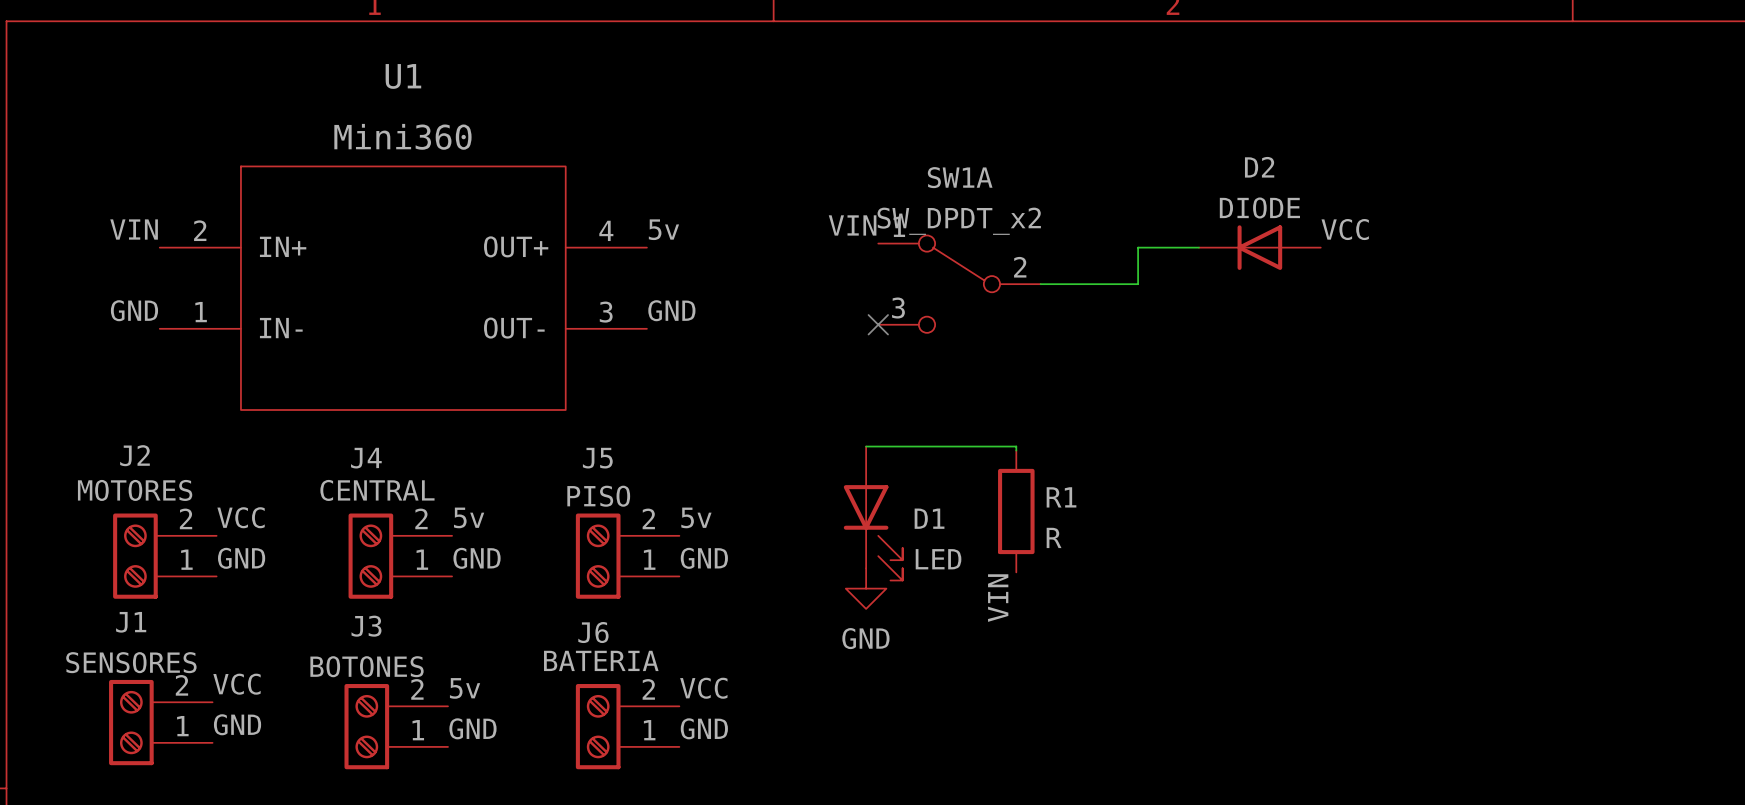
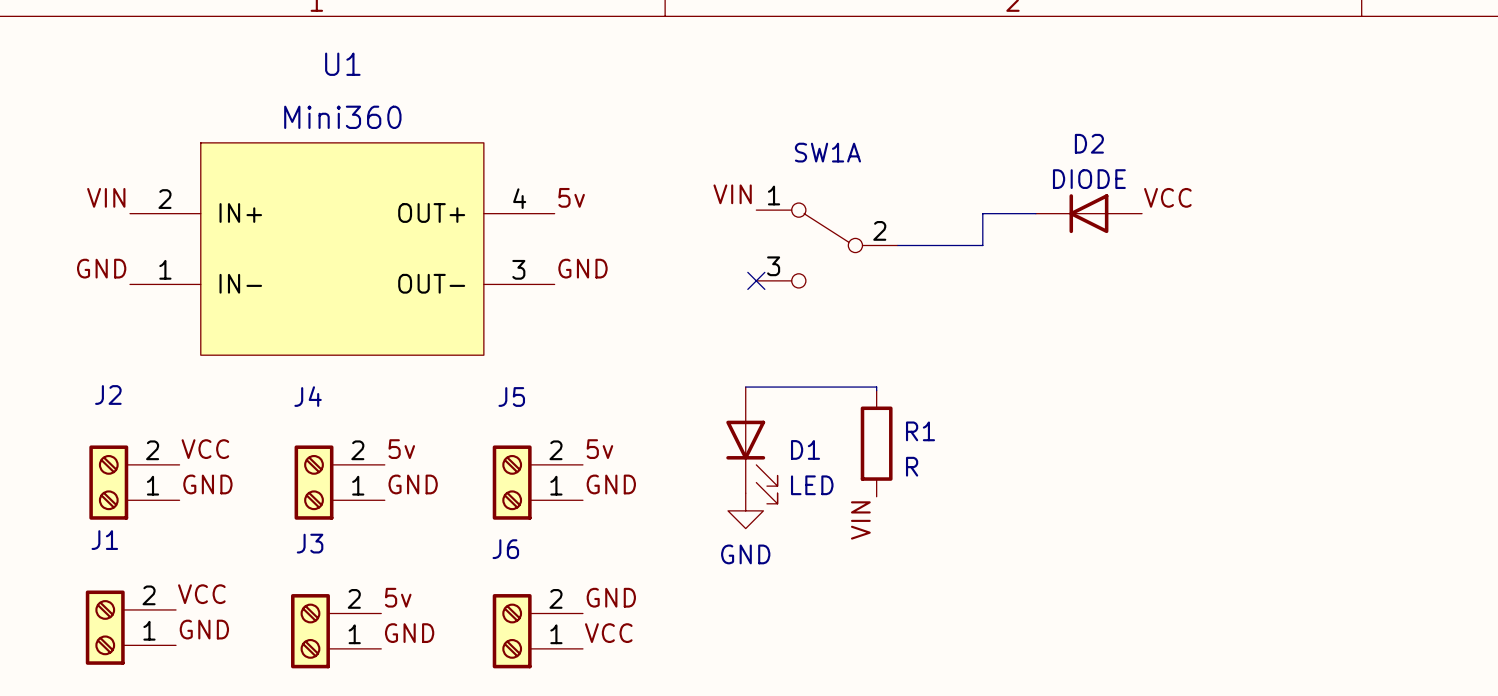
SW1A value: SW_DPDT_x2 (959, 221) -> none
J2 value: MOTORES (135, 490) -> none
J4 value: CENTRAL (377, 490) -> none
J5 value: PISO (598, 496) -> none
J6 value: BATERIA (601, 660) -> none
J1 value: SENSORES (131, 662) -> none
J3 value: BOTONES (367, 666) -> none
label: VCC (703, 688) -> GND (611, 597)
label: GND (704, 728) -> VCC (608, 633)

